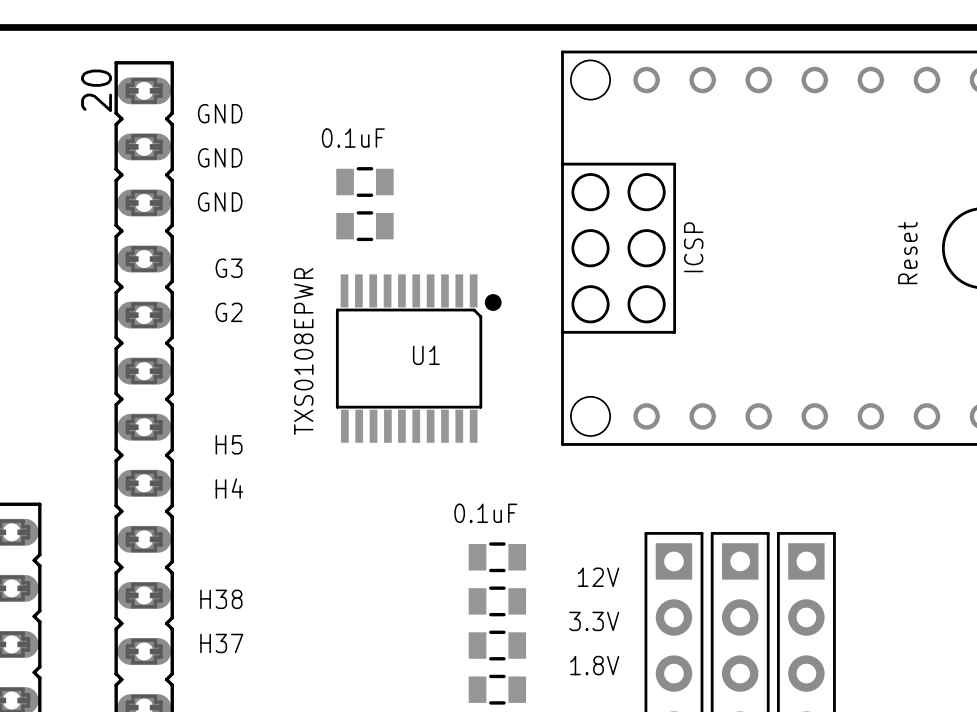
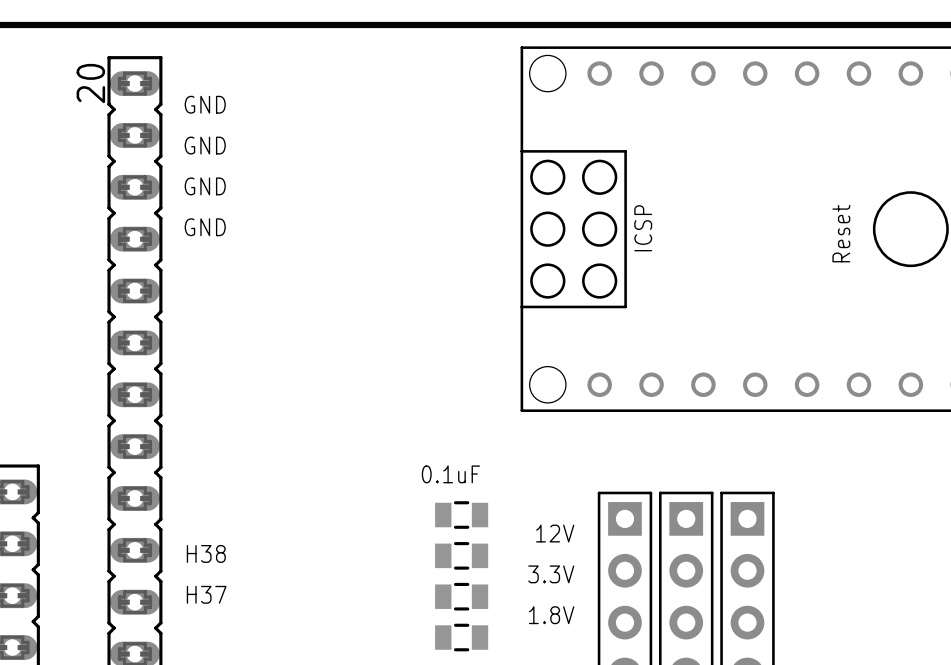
part: 0.1uF (364, 182) -> none
part: (364, 226) -> none
text: none -> GND (205, 227)
text: G3 (229, 268) -> none
text: G2 (229, 312) -> none
U1: TXS0108EPWR (418, 358) -> none
text: H5 (229, 444) -> none
text: H4 (229, 488) -> none

